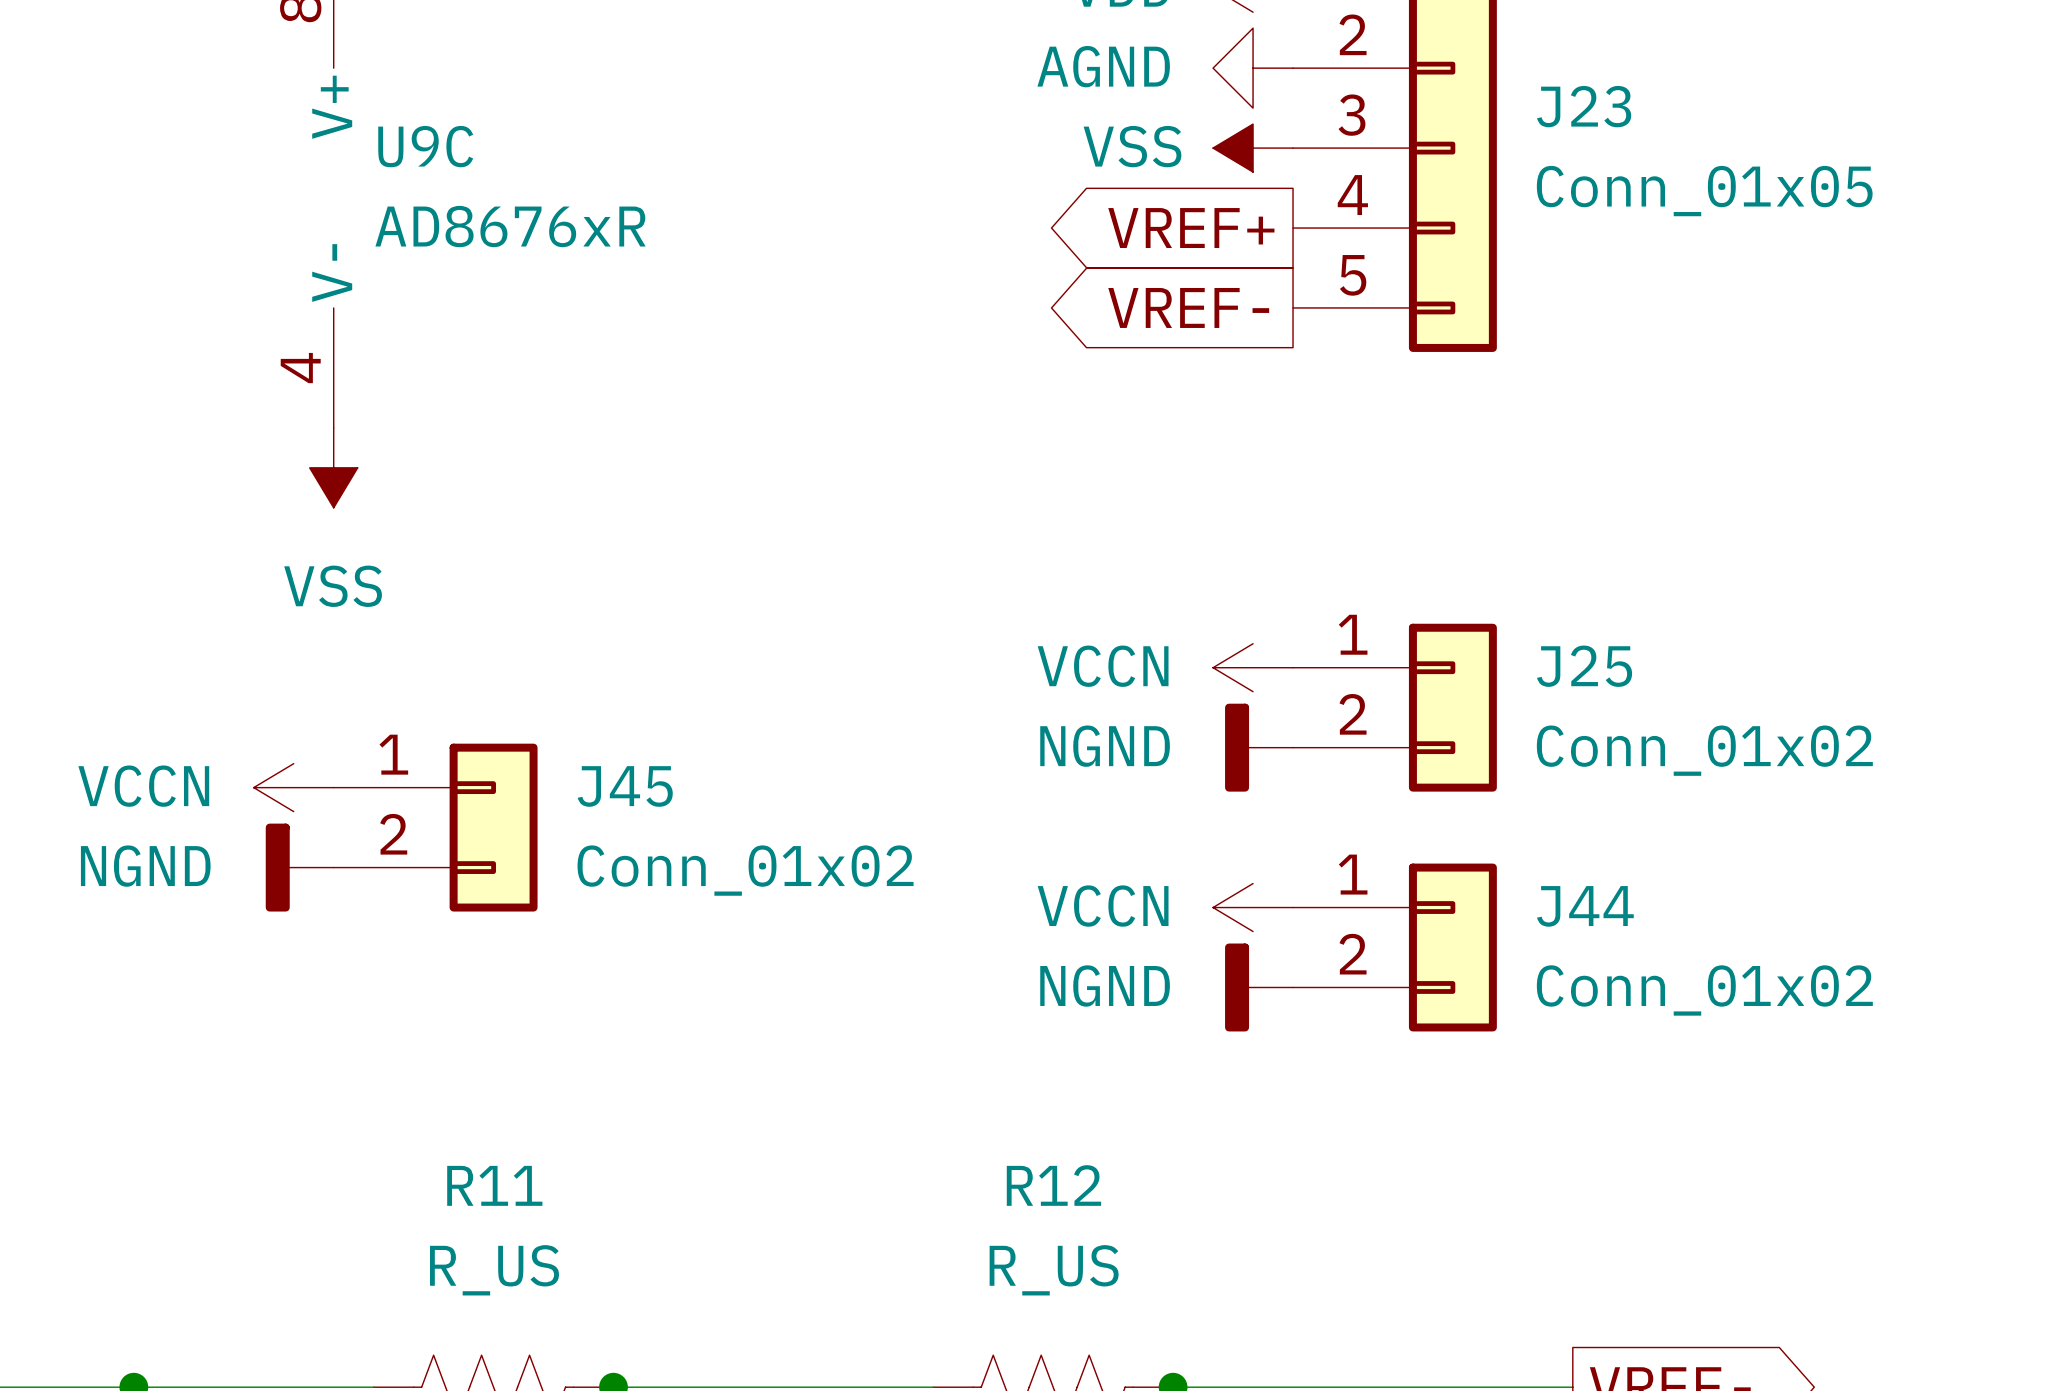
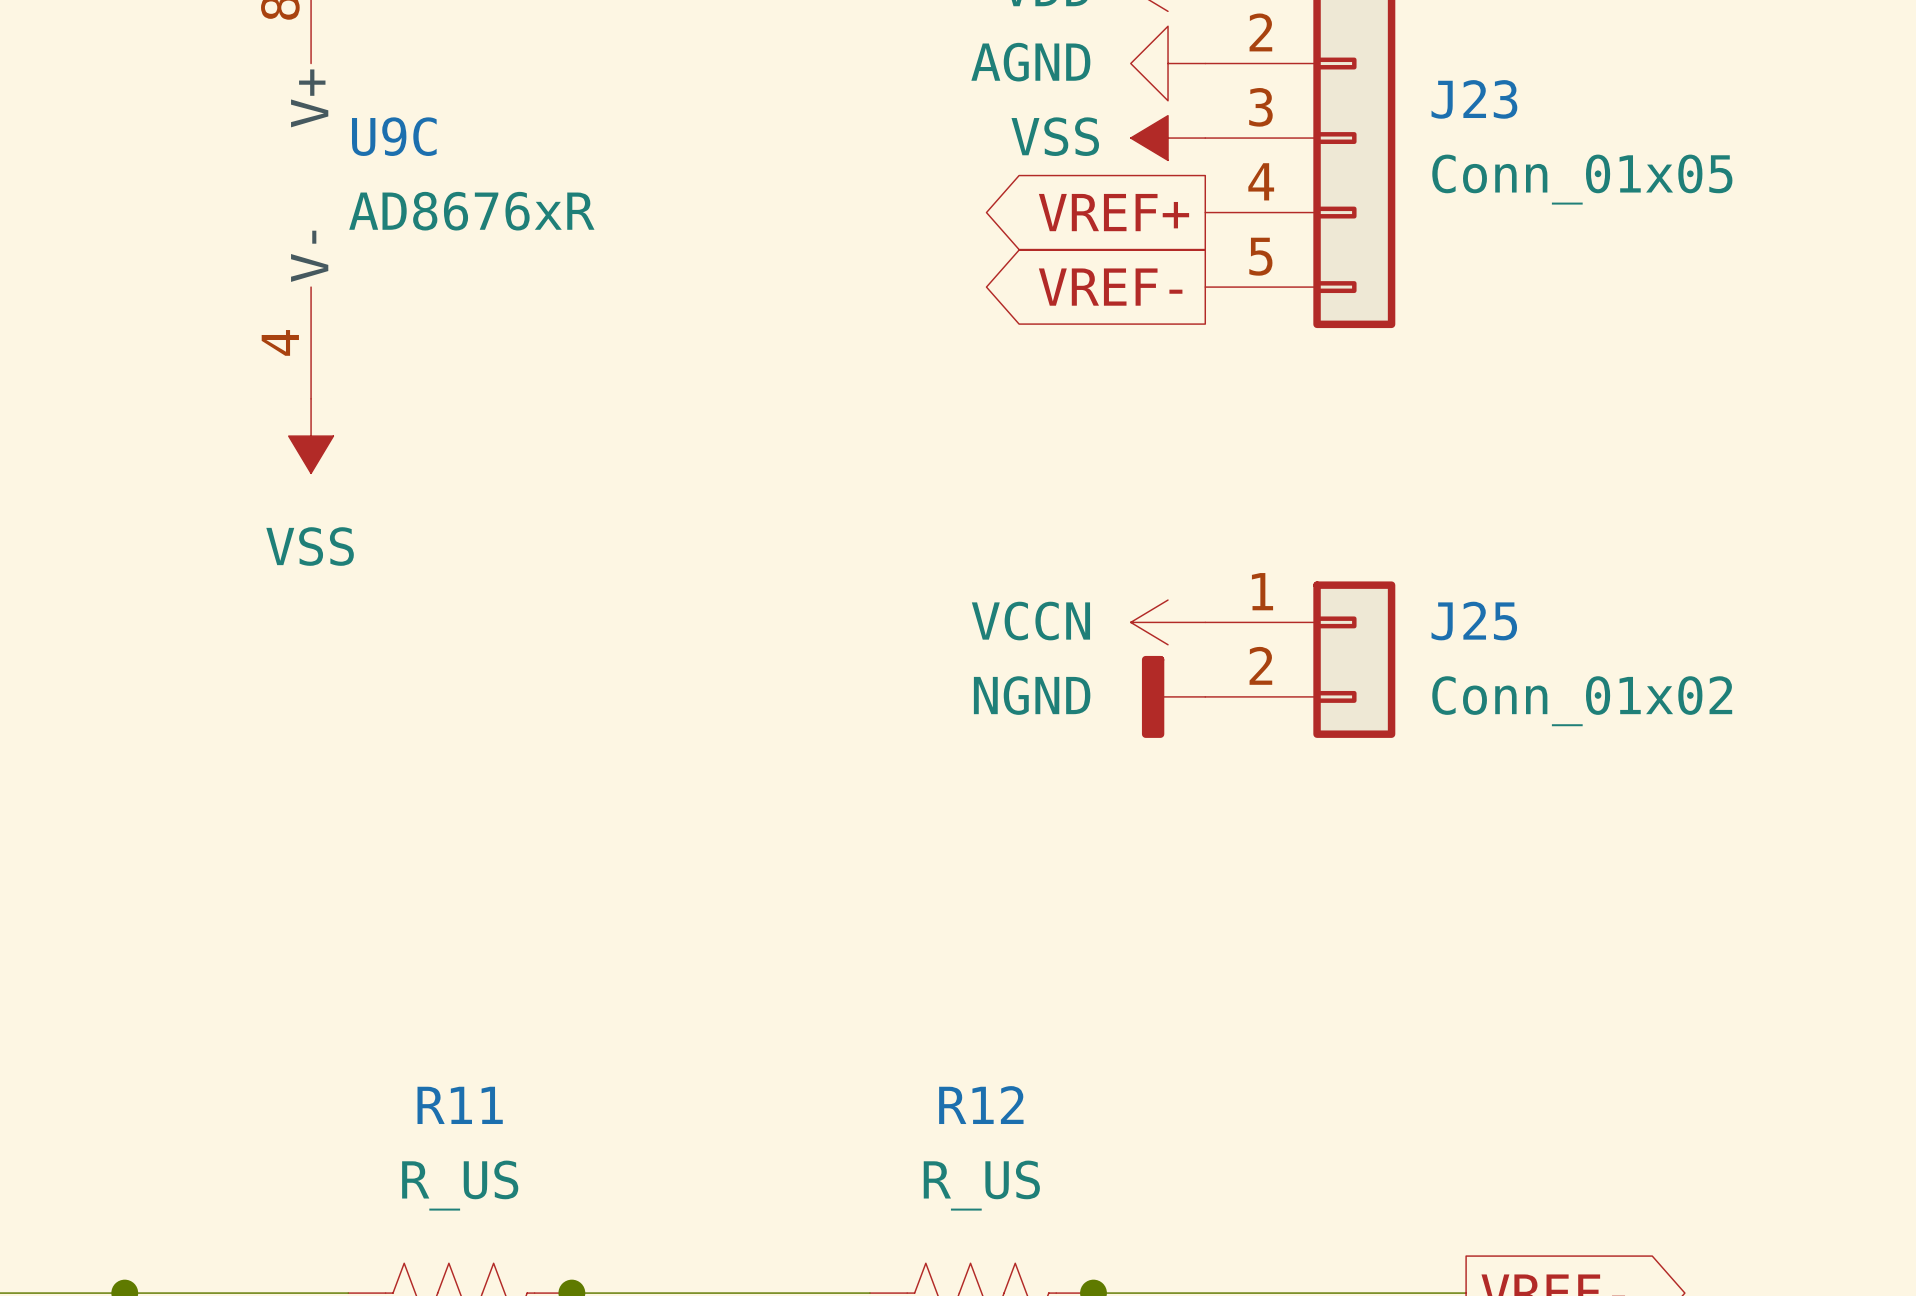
power symbol: VCCN (293, 787) -> none
J45: Conn_01x02 (435, 827) -> none
power symbol: NGND (299, 867) -> none
power symbol: VCCN (1253, 907) -> none
J44: Conn_01x02 (1394, 947) -> none
power symbol: NGND (1259, 987) -> none

